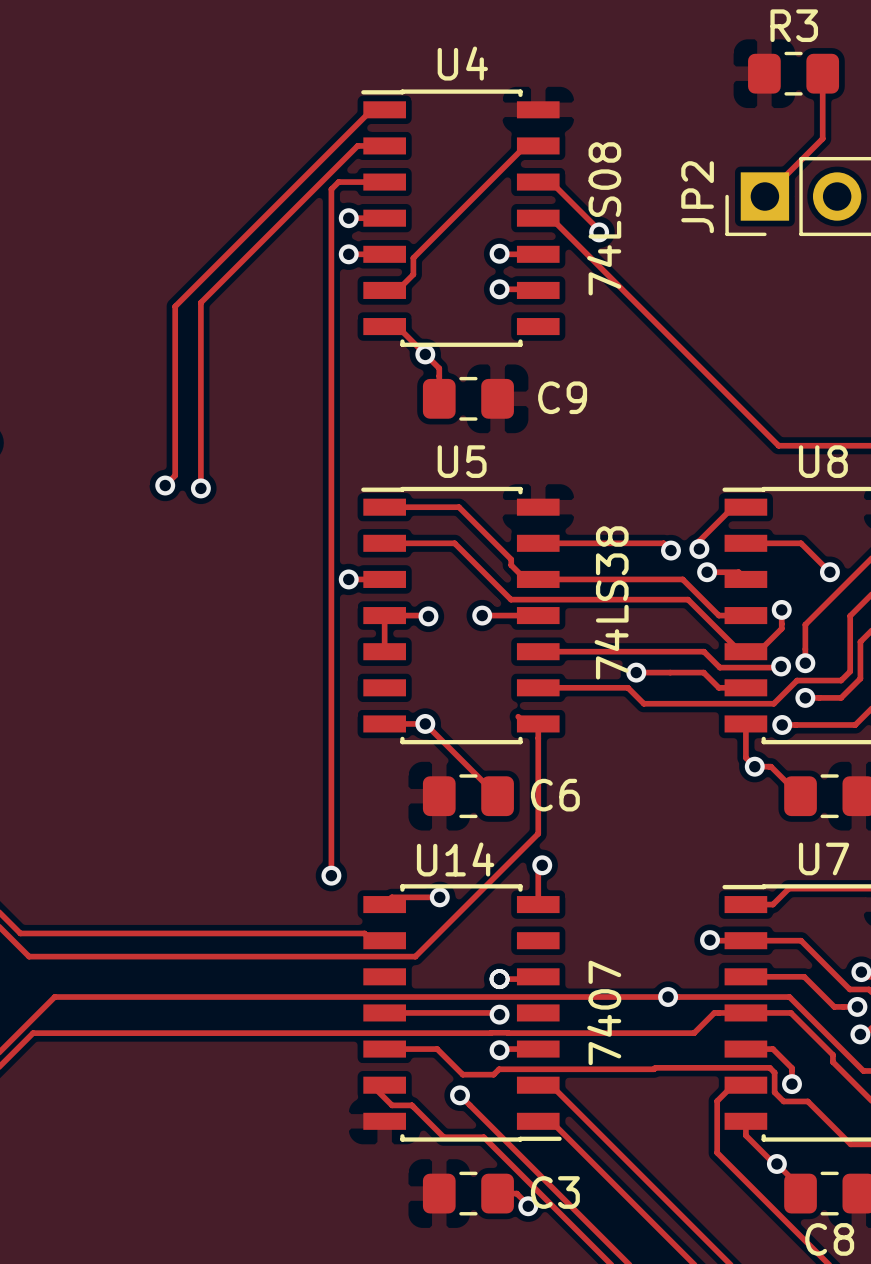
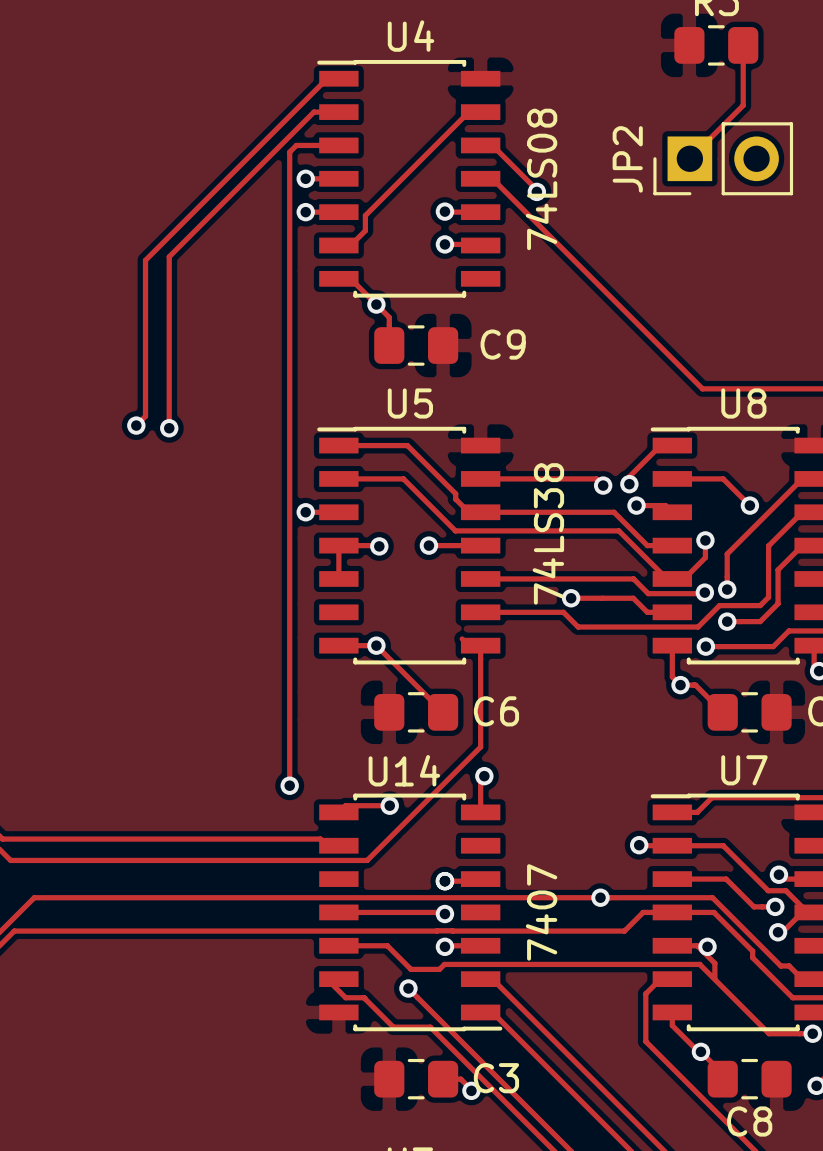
track: (654, 1069) (769, 1067) (774, 1072) (774, 1092) (783, 1101) (807, 1101) -> (587, 964) (699, 964) (729, 994)
via position: (791, 1084) -> (707, 946)

